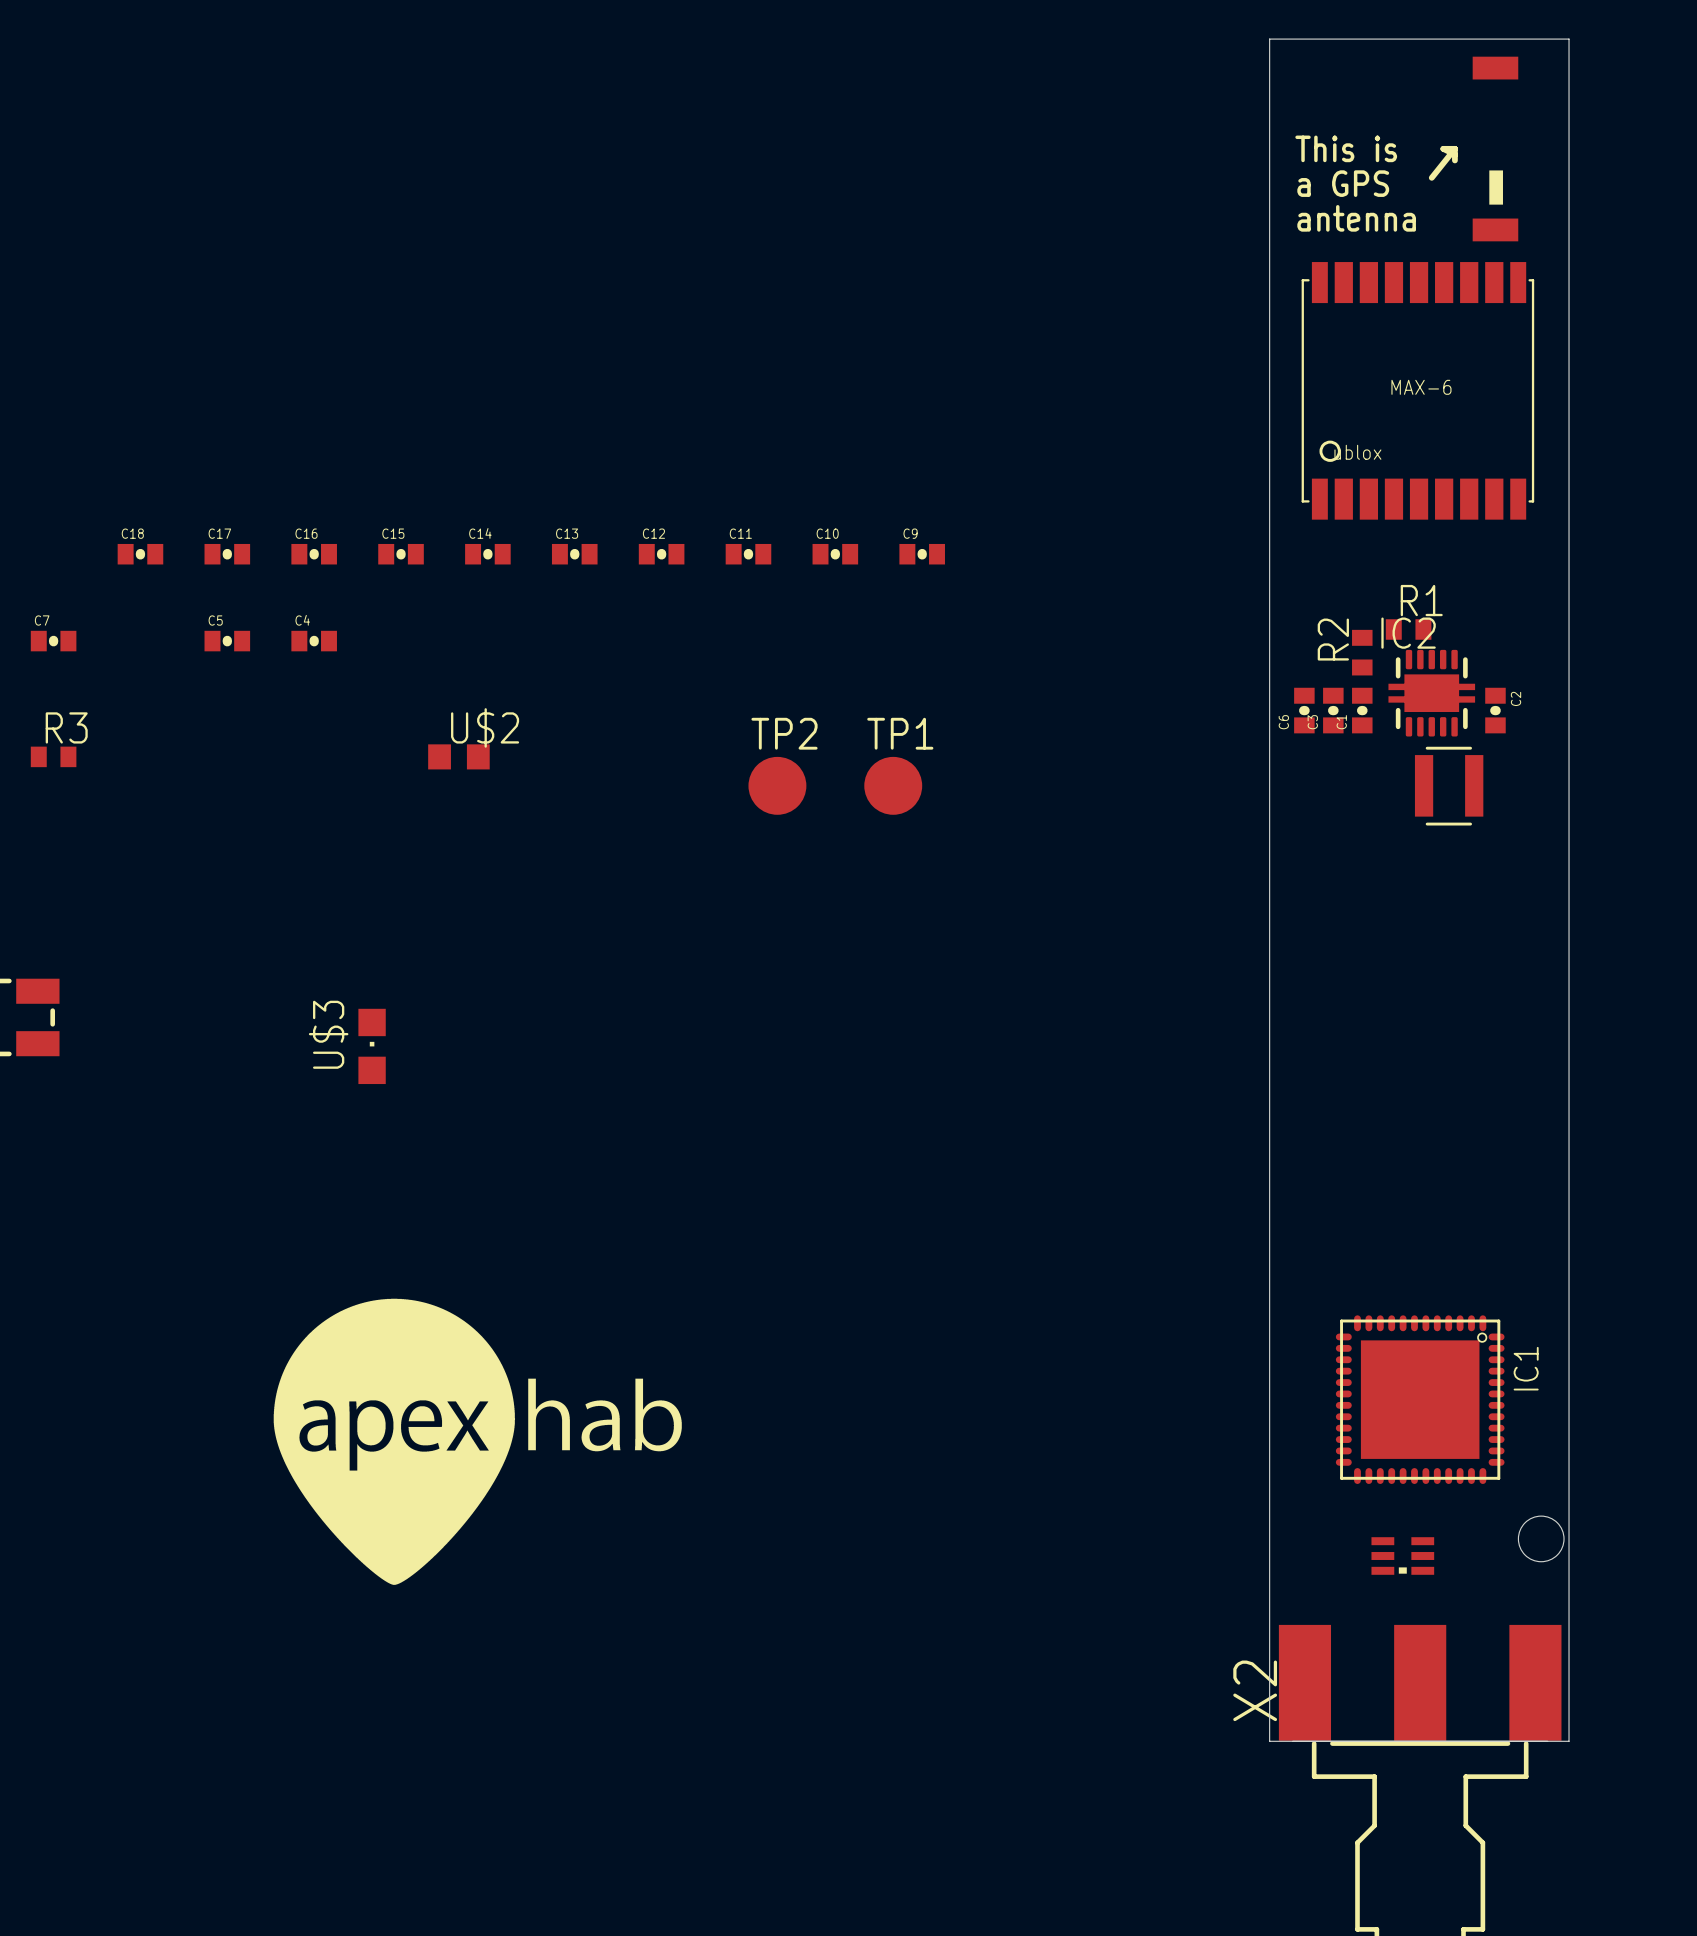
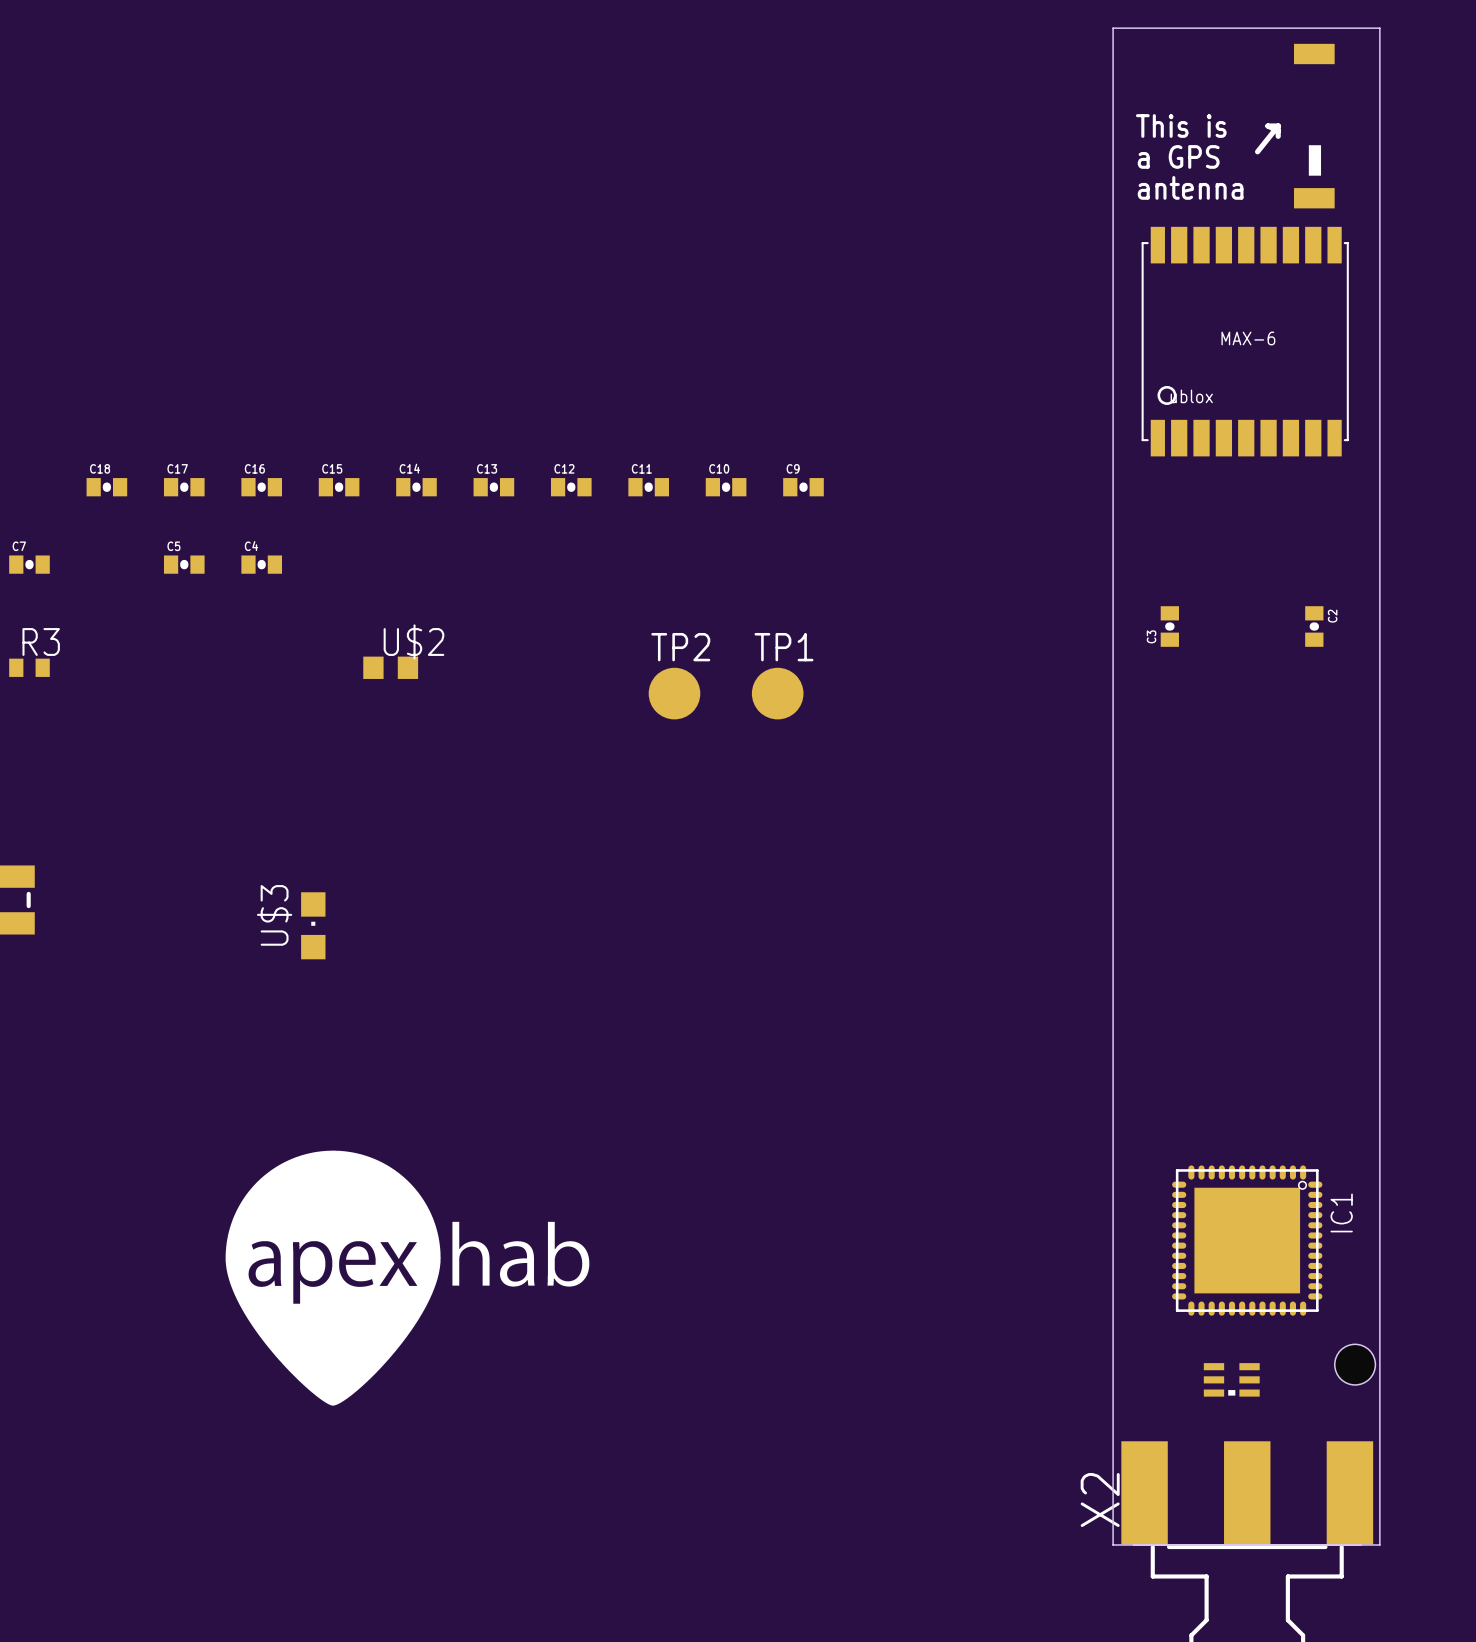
R1: (1408, 629) -> none
R2: (1362, 652) -> none
IC2: (1431, 693) -> none
C6: (1304, 710) -> none
C1: (1362, 710) -> none
part: (1449, 786) -> none

